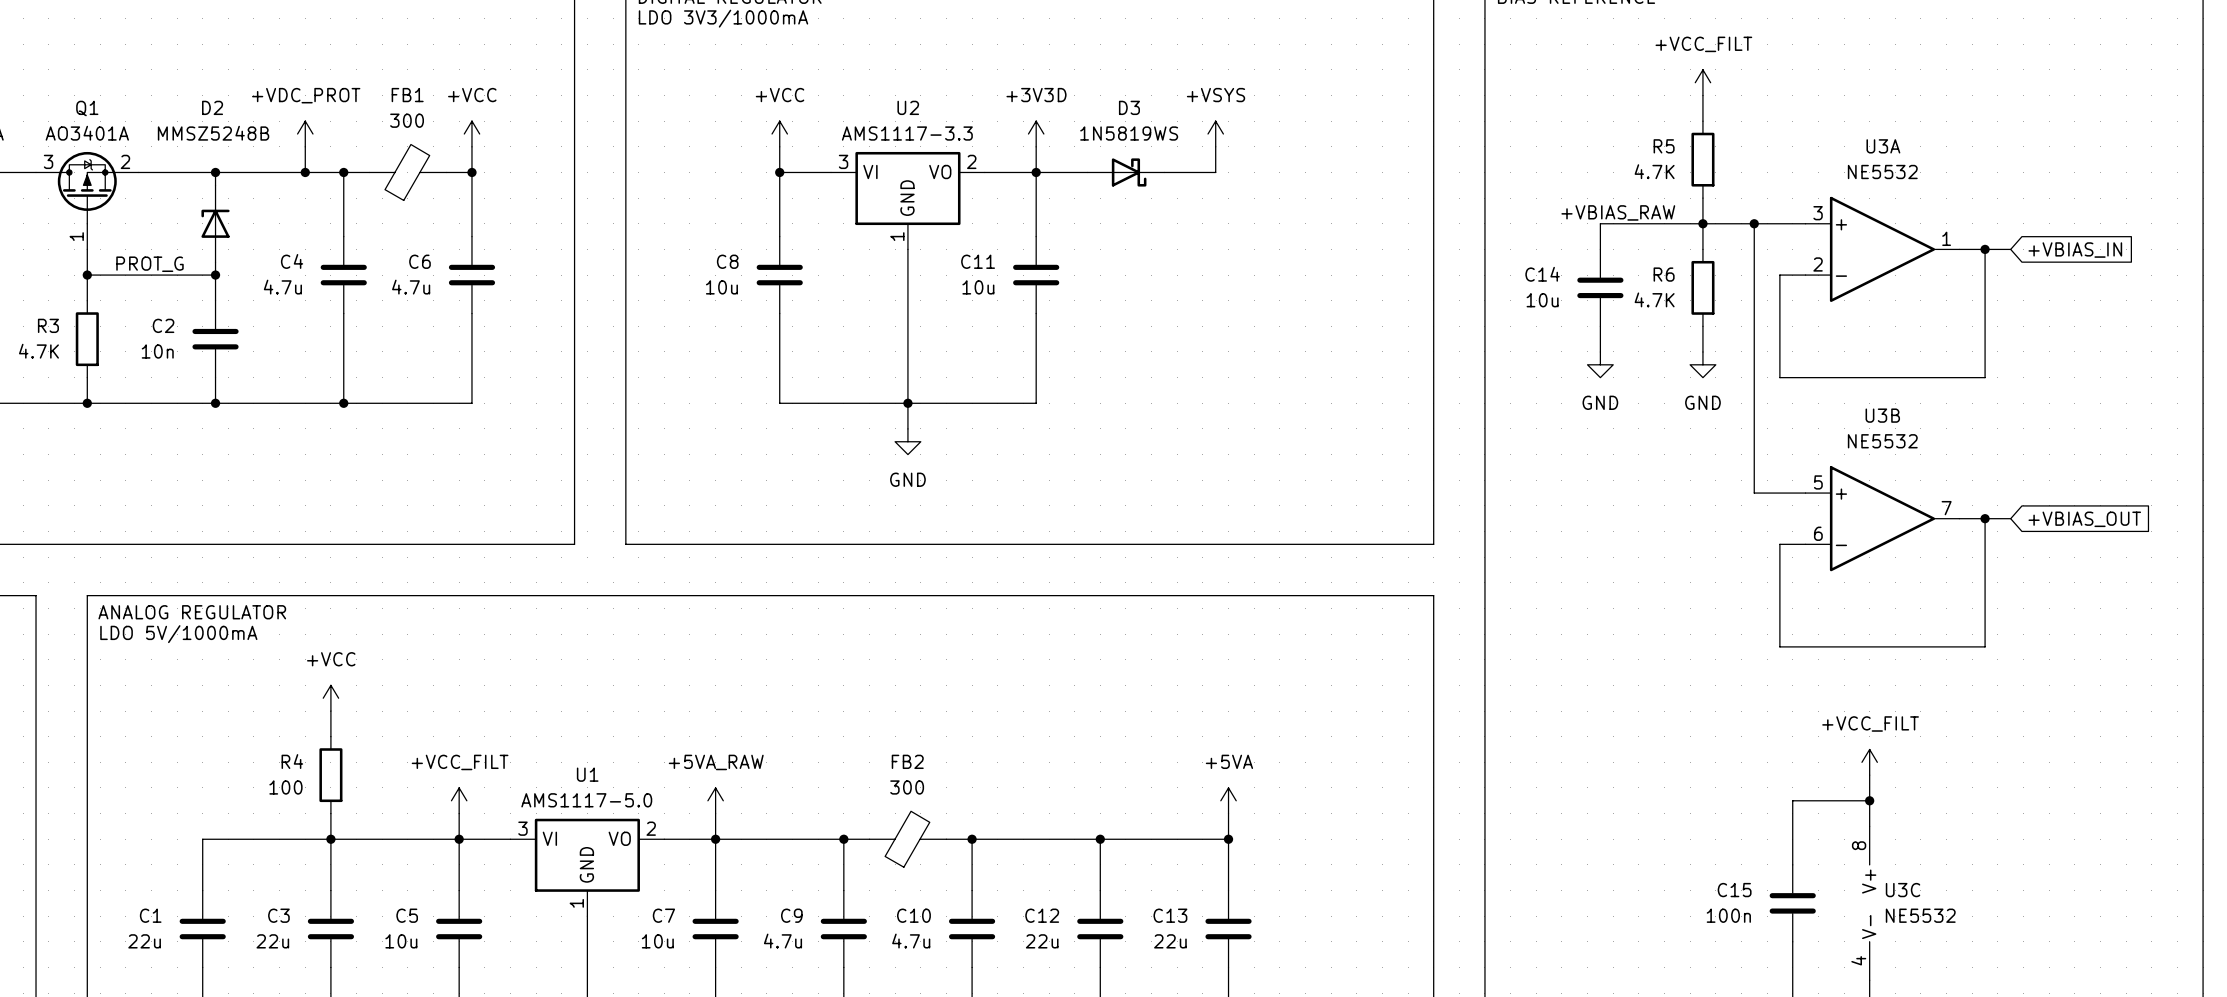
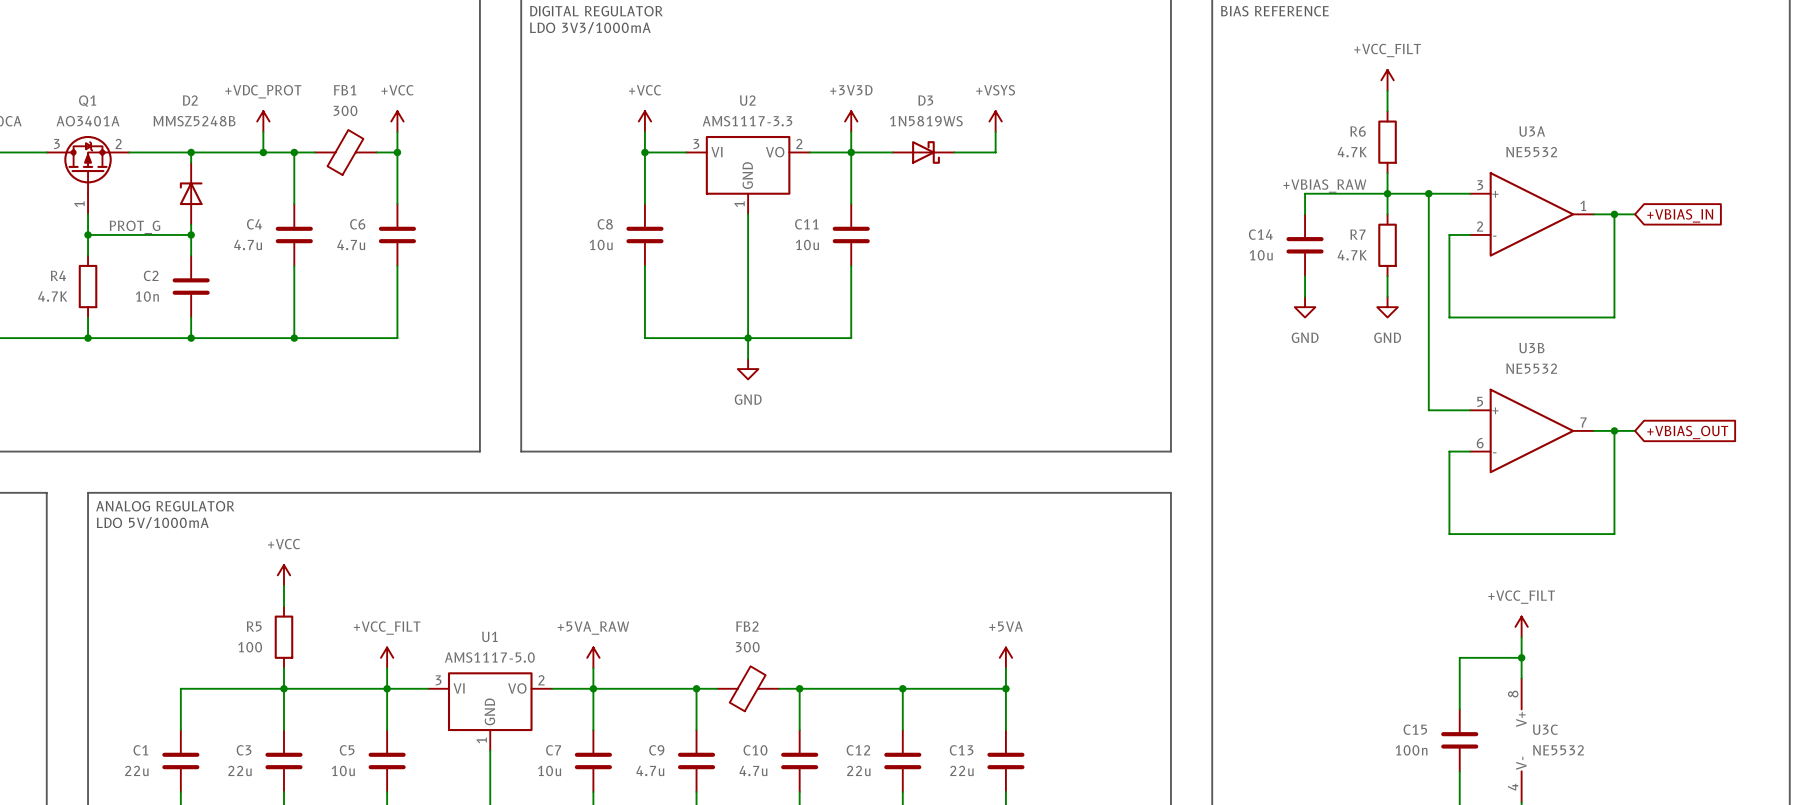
R5 name: R5 (1664, 146) -> R6 (1358, 131)
R6 name: R6 (1664, 274) -> R7 (1357, 234)
R3 name: R3 (48, 325) -> R4 (58, 275)
R4 name: R4 (292, 761) -> R5 (254, 626)

